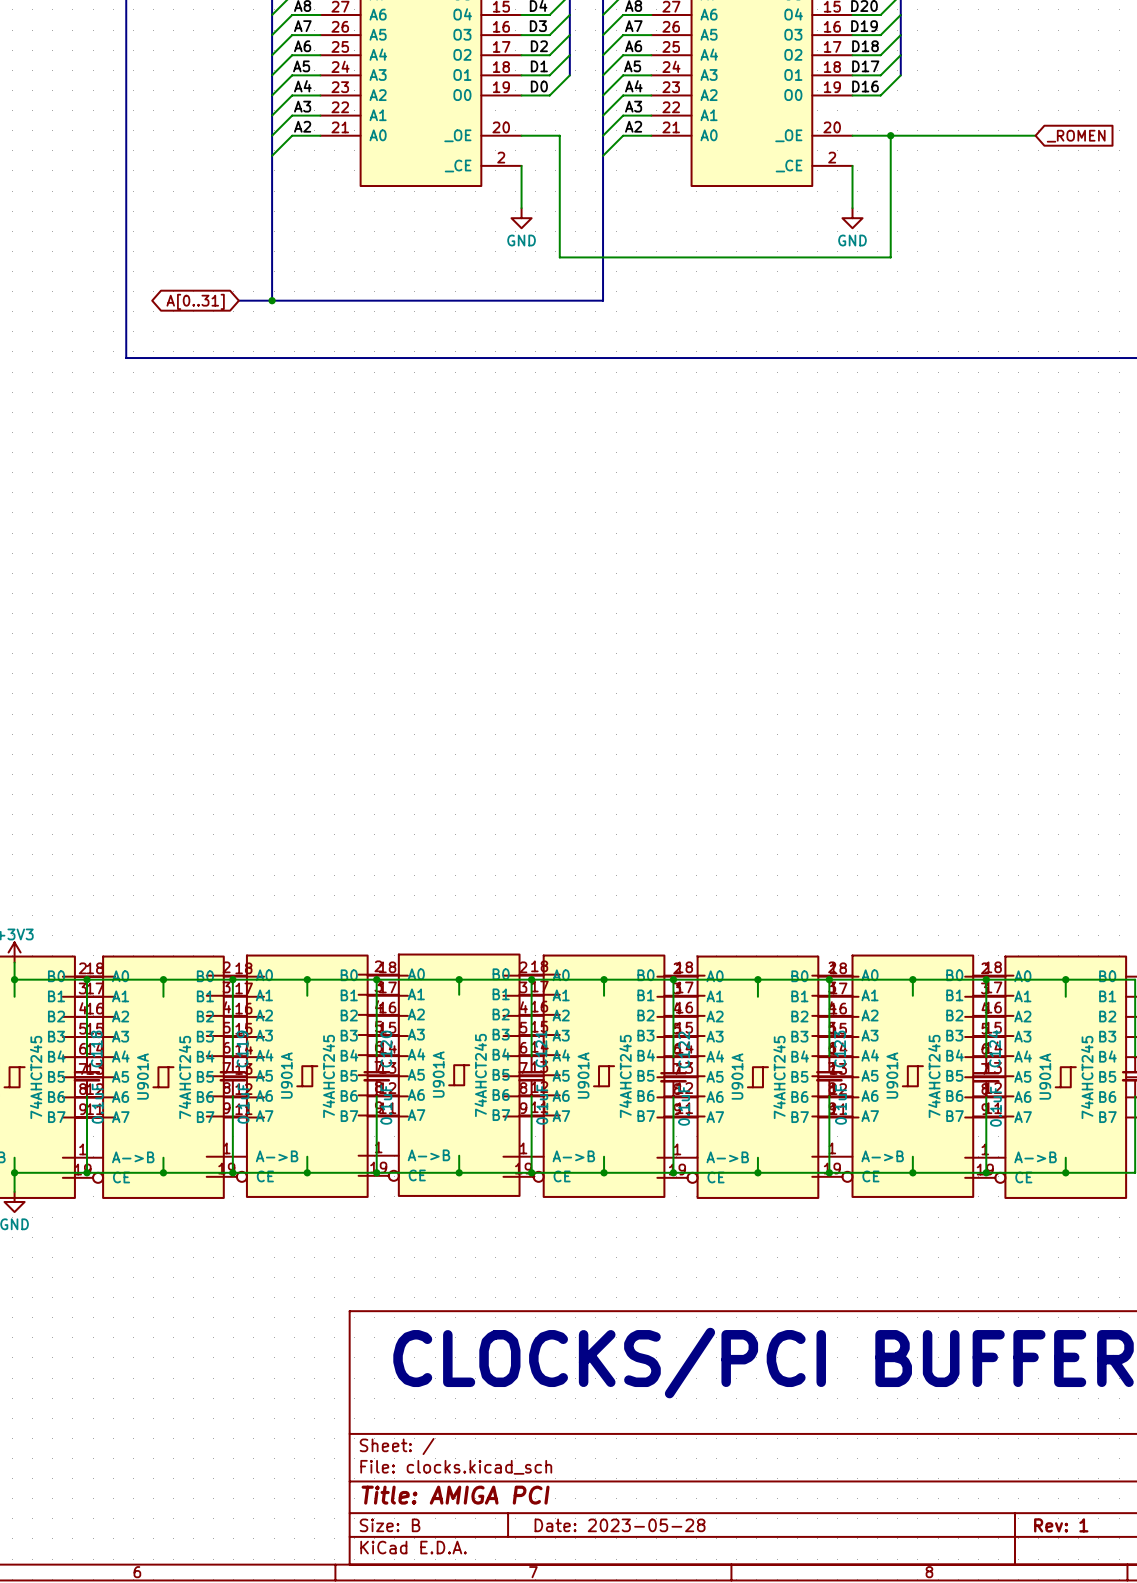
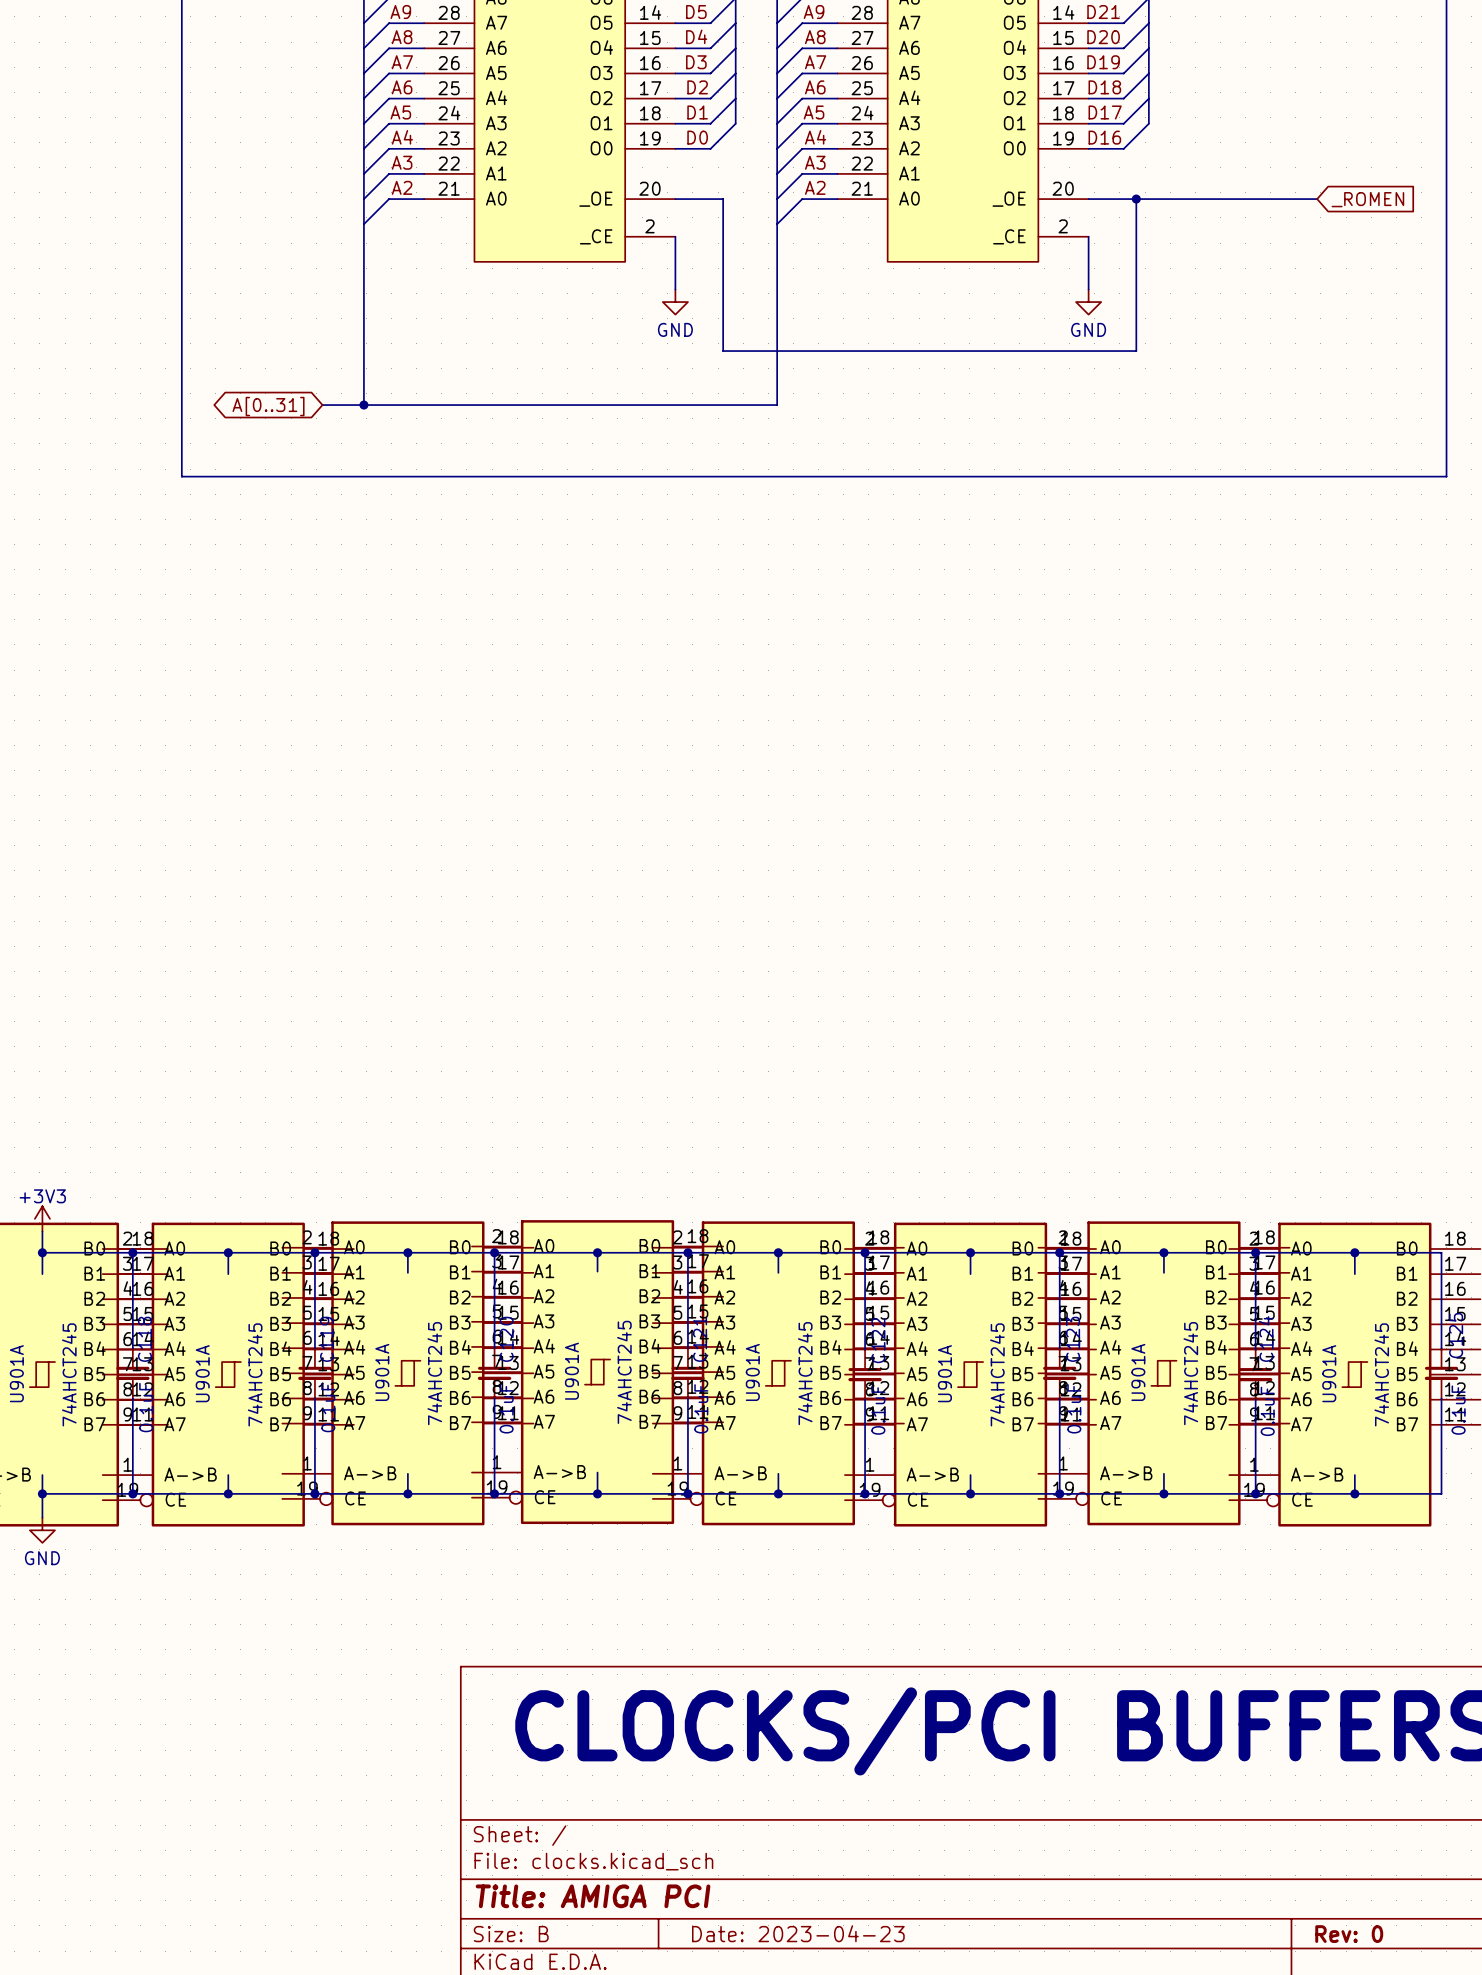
title block: Date: 2023-05-28 (620, 1525) -> Date: 2023-04-23 (798, 1933)
title block: Rev: 1 (1061, 1525) -> Rev: 0 (1349, 1934)

